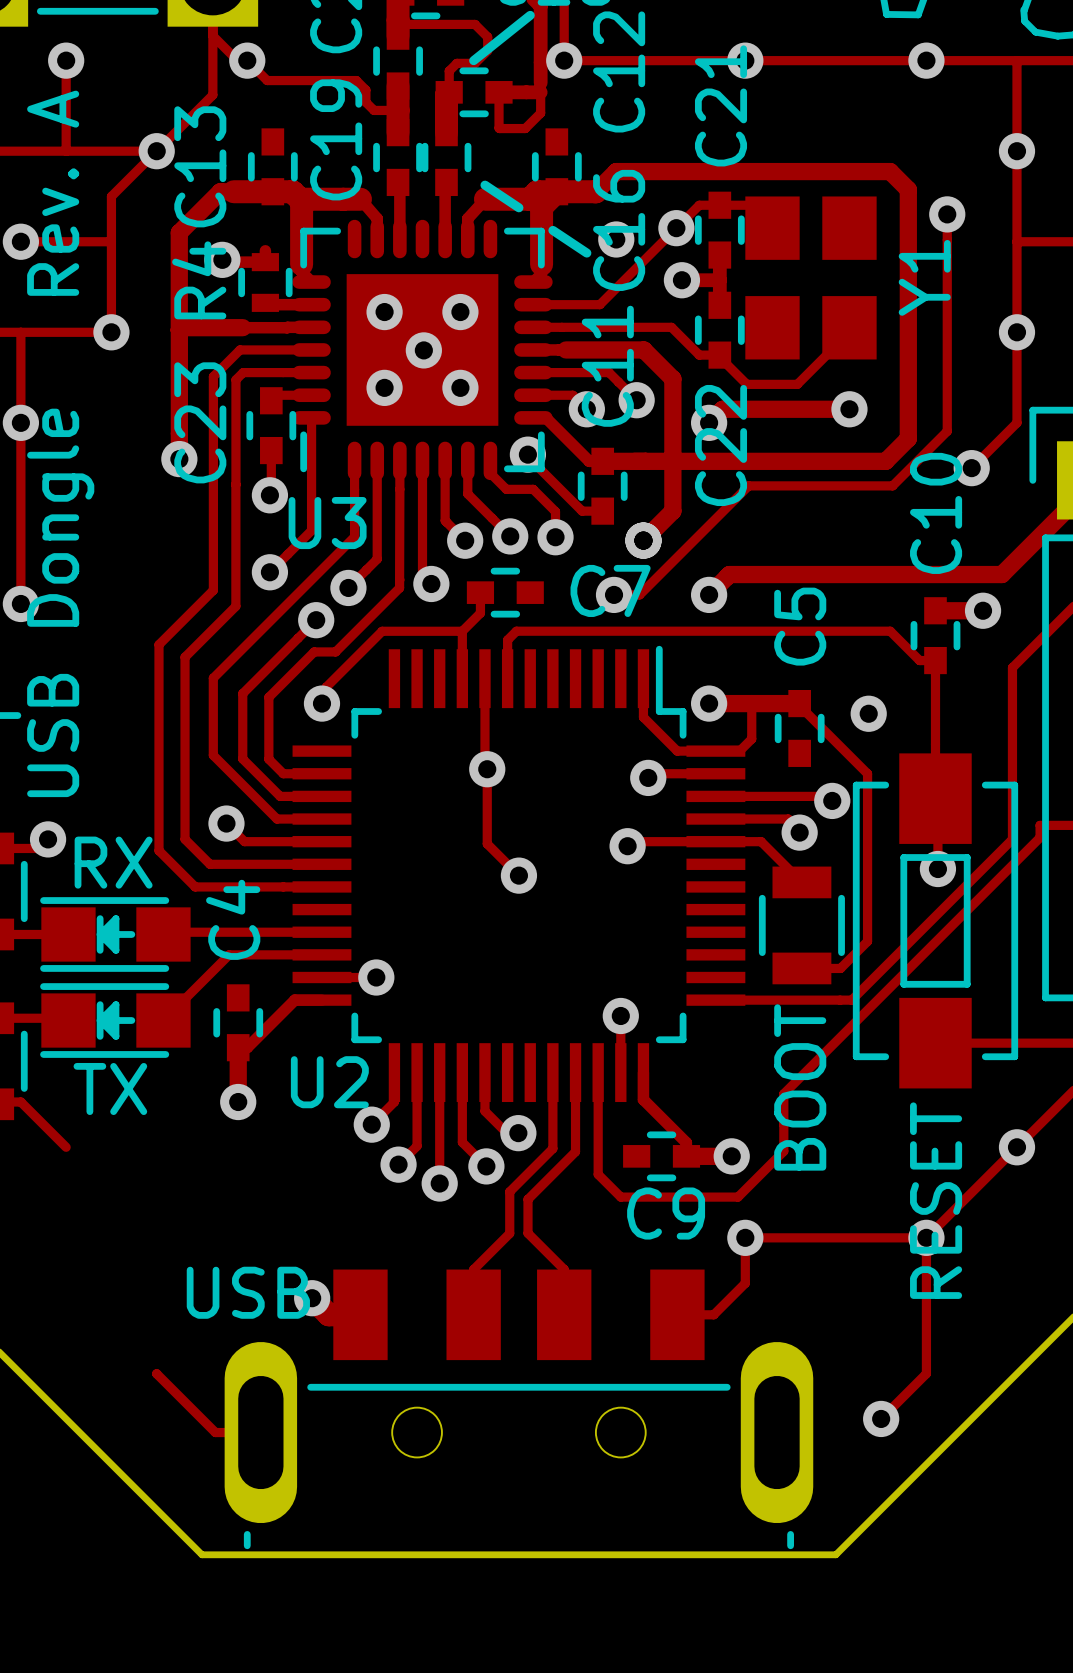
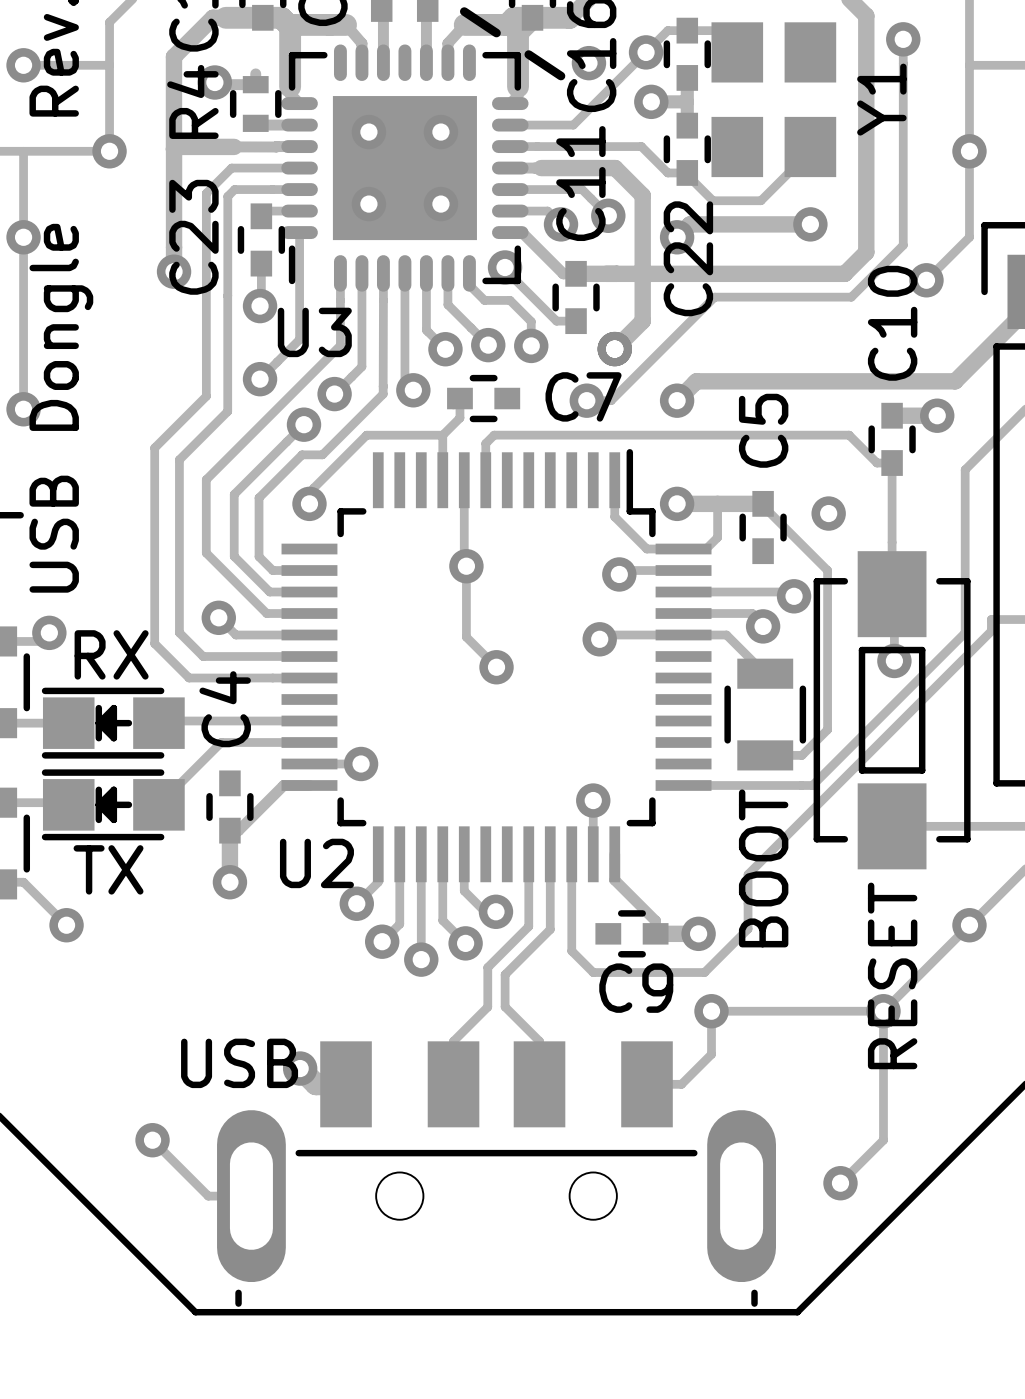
via: (423, 350) -> none
via: none -> (66, 925)
via: none -> (152, 1140)

